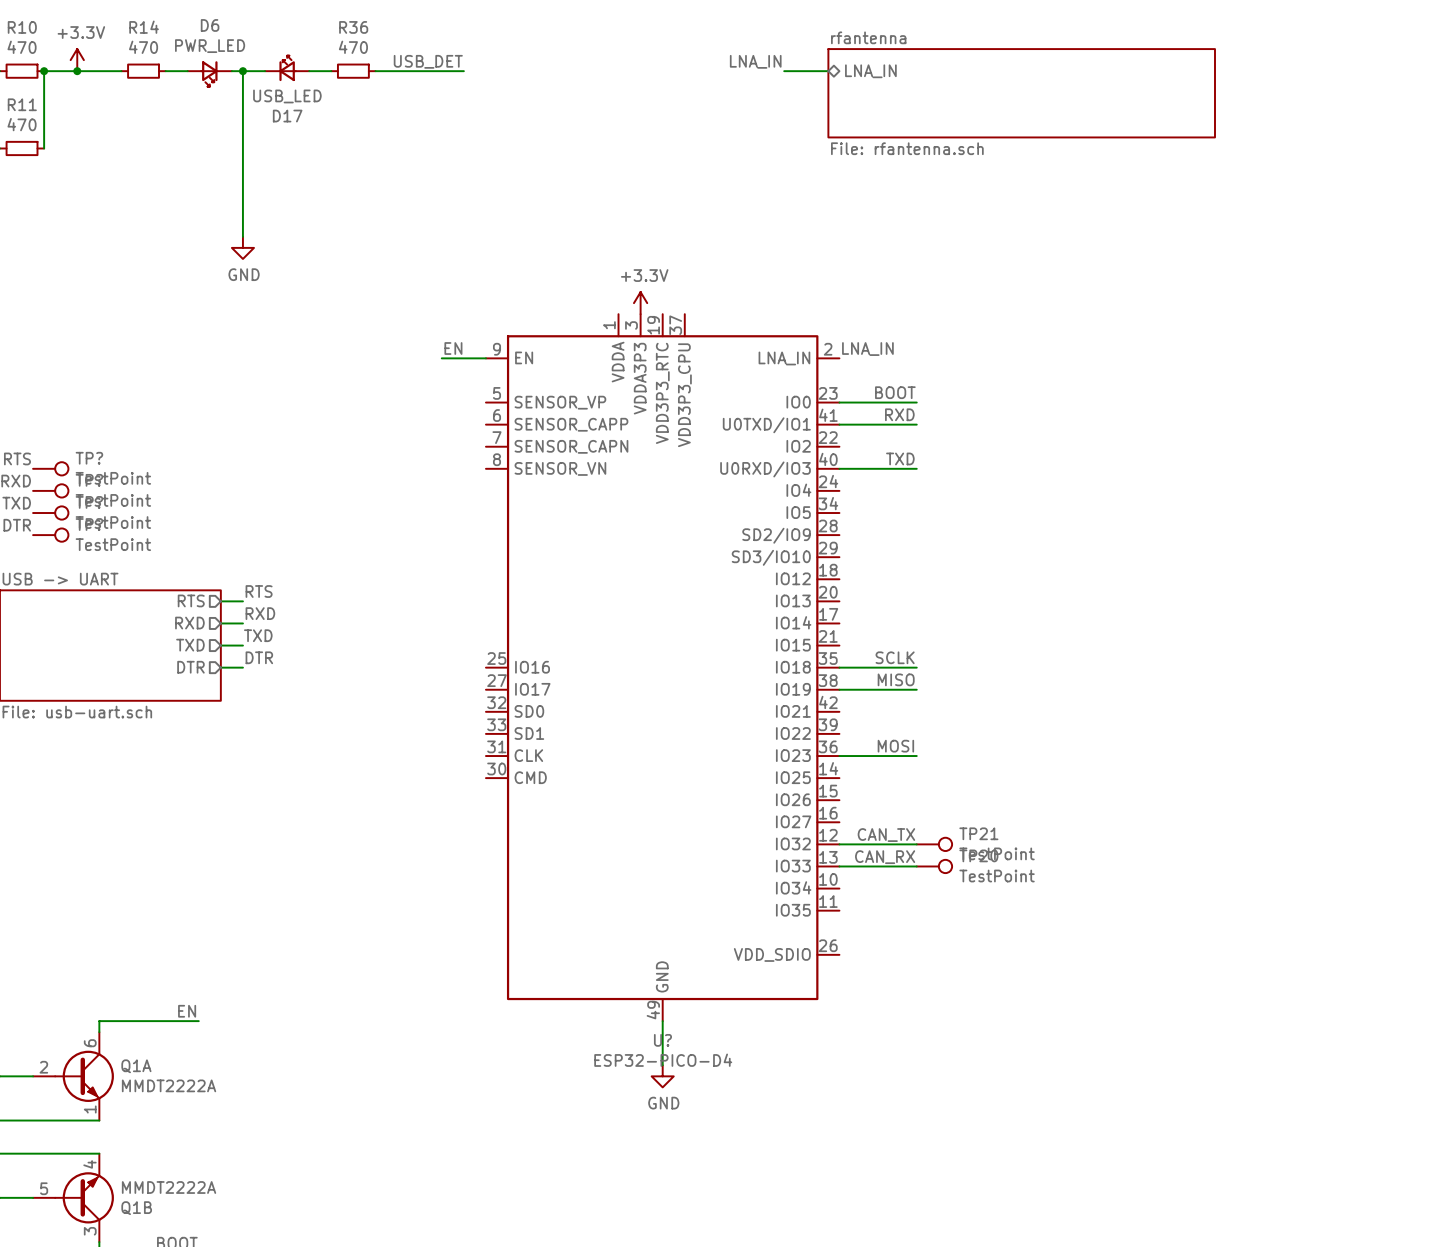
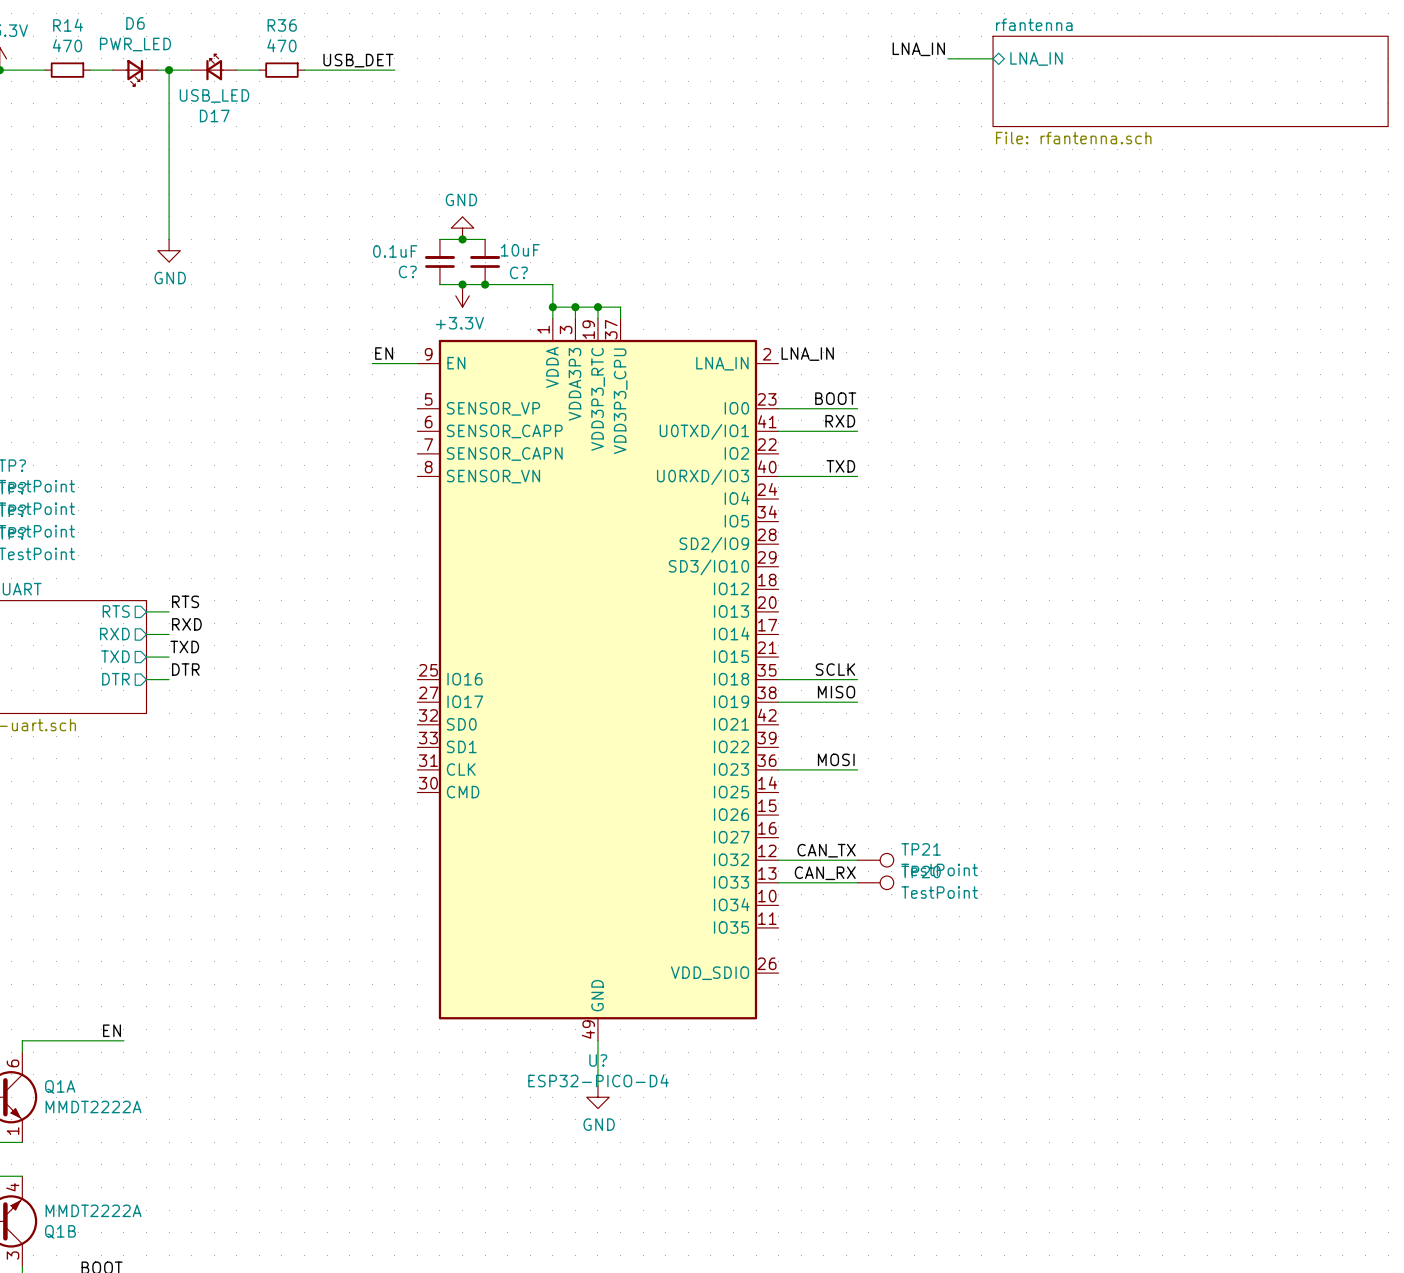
label: none -> LNA_IN (918, 49)
wire: none -> (947, 58) (993, 58)
sheet pin: none -> LNA_IN (1036, 58)
label: LNA_IN (755, 61) -> none
wire: (784, 71) (828, 71) -> none
sheet pin: LNA_IN (870, 71) -> none
sheet rfantenna: none -> File: rfantenna.sch (1190, 81)
sheet rfantenna: File: rfantenna.sch (1021, 93) -> none
power symbol: none -> GND (462, 228)
wire: none -> (439, 239) (485, 239)
junction: none -> (462, 239)
C?: none -> 0.1uF (439, 262)
C?: none -> 10uF (485, 262)
wire: none -> (439, 284) (552, 284) (552, 318)
junction: none -> (462, 284)
junction: none -> (485, 284)
wire: none -> (552, 307) (620, 307) (620, 318)
junction: none -> (552, 307)
power symbol rotation: 0° (640, 303) -> 180° (462, 295)
power symbol position: +3.3V (640, 303) -> +3.3V (462, 295)
junction: none -> (575, 307)
wire: none -> (597, 307) (597, 318)
junction: none -> (597, 307)

